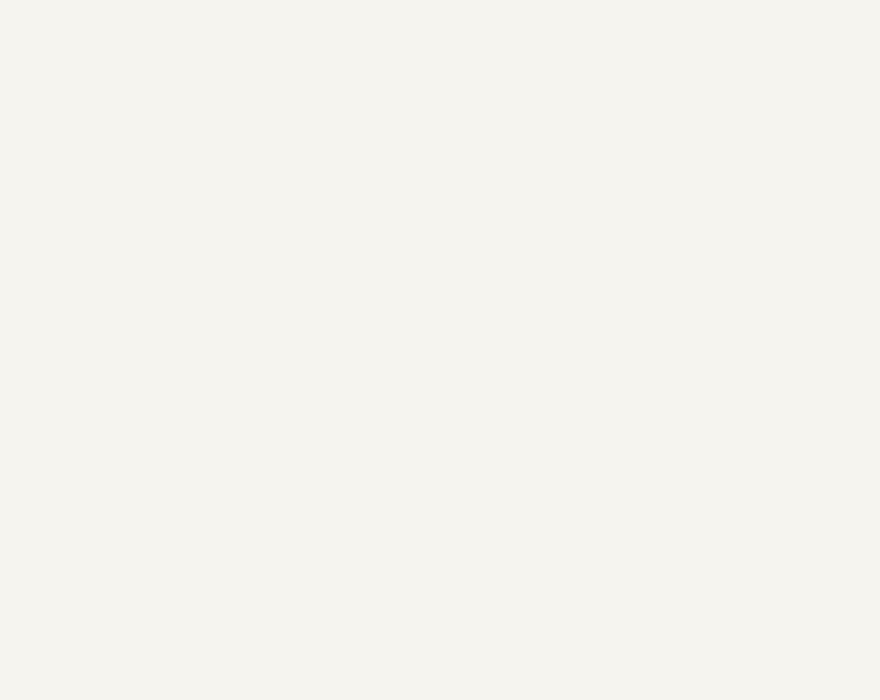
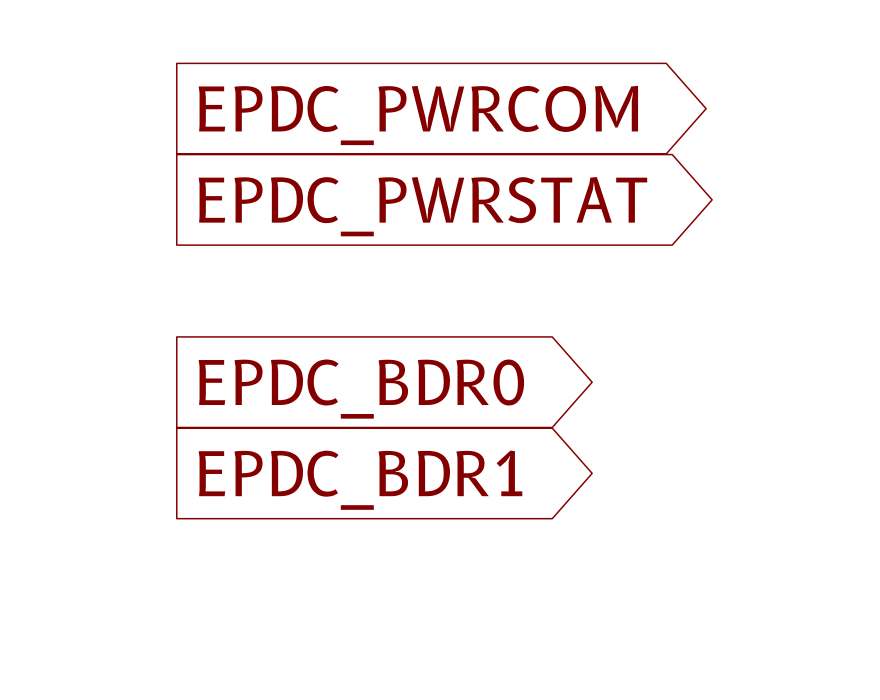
global label: none -> EPDC_PWRCOM (418, 115)
global label: none -> EPDC_PWRSTAT (422, 206)
global label: none -> EPDC_BDR0 (361, 389)
global label: none -> EPDC_BDR1 (360, 480)

